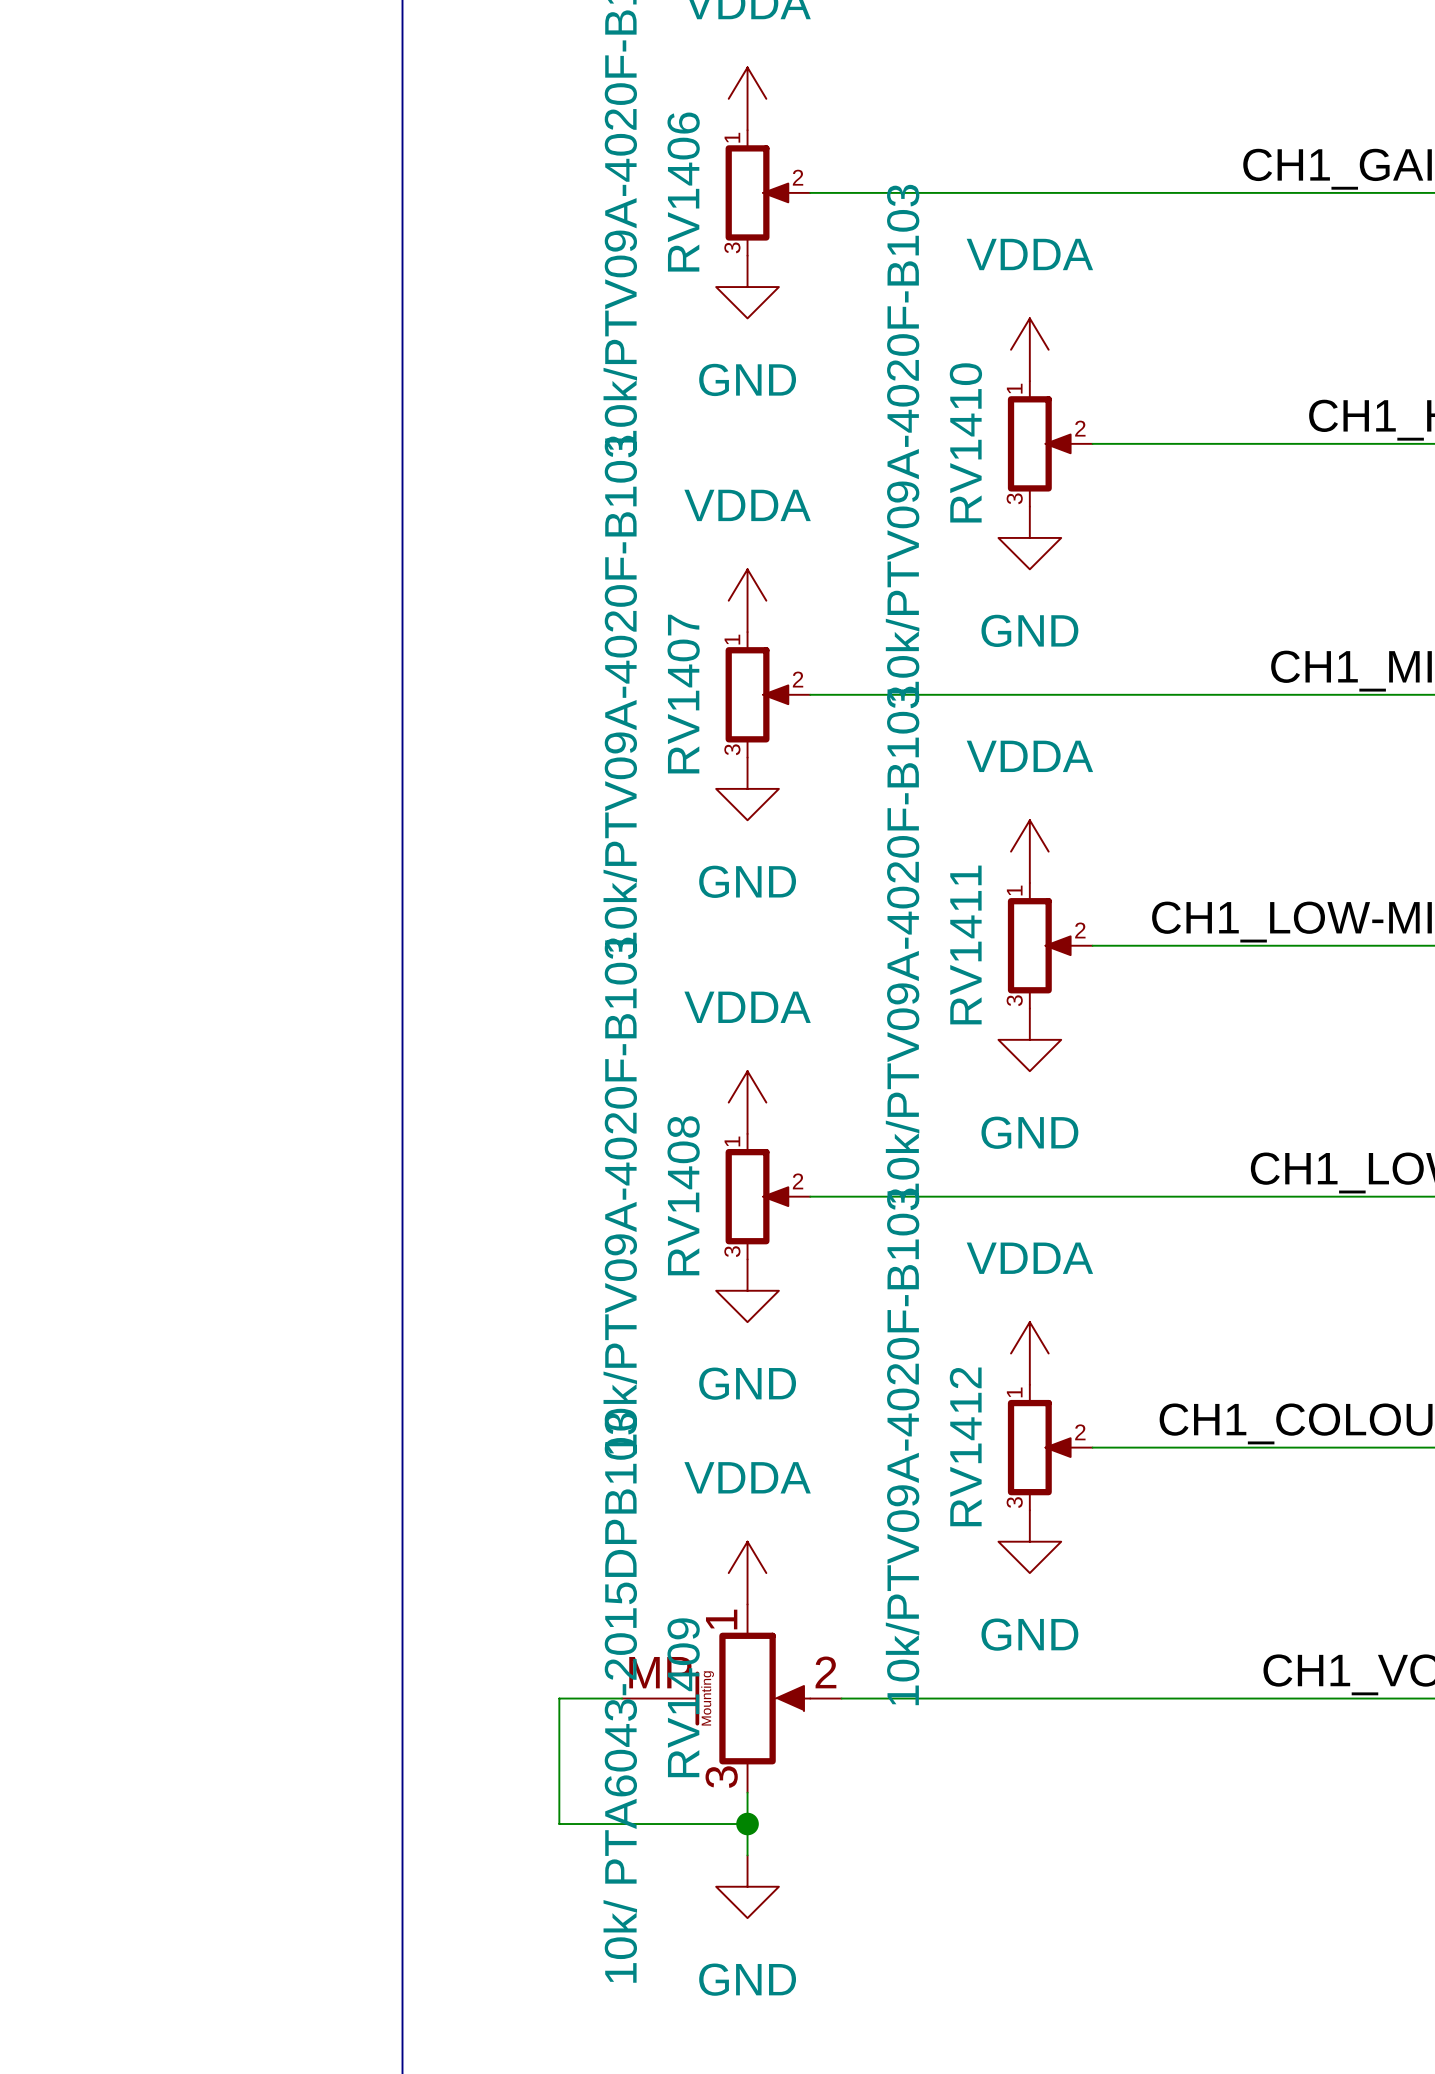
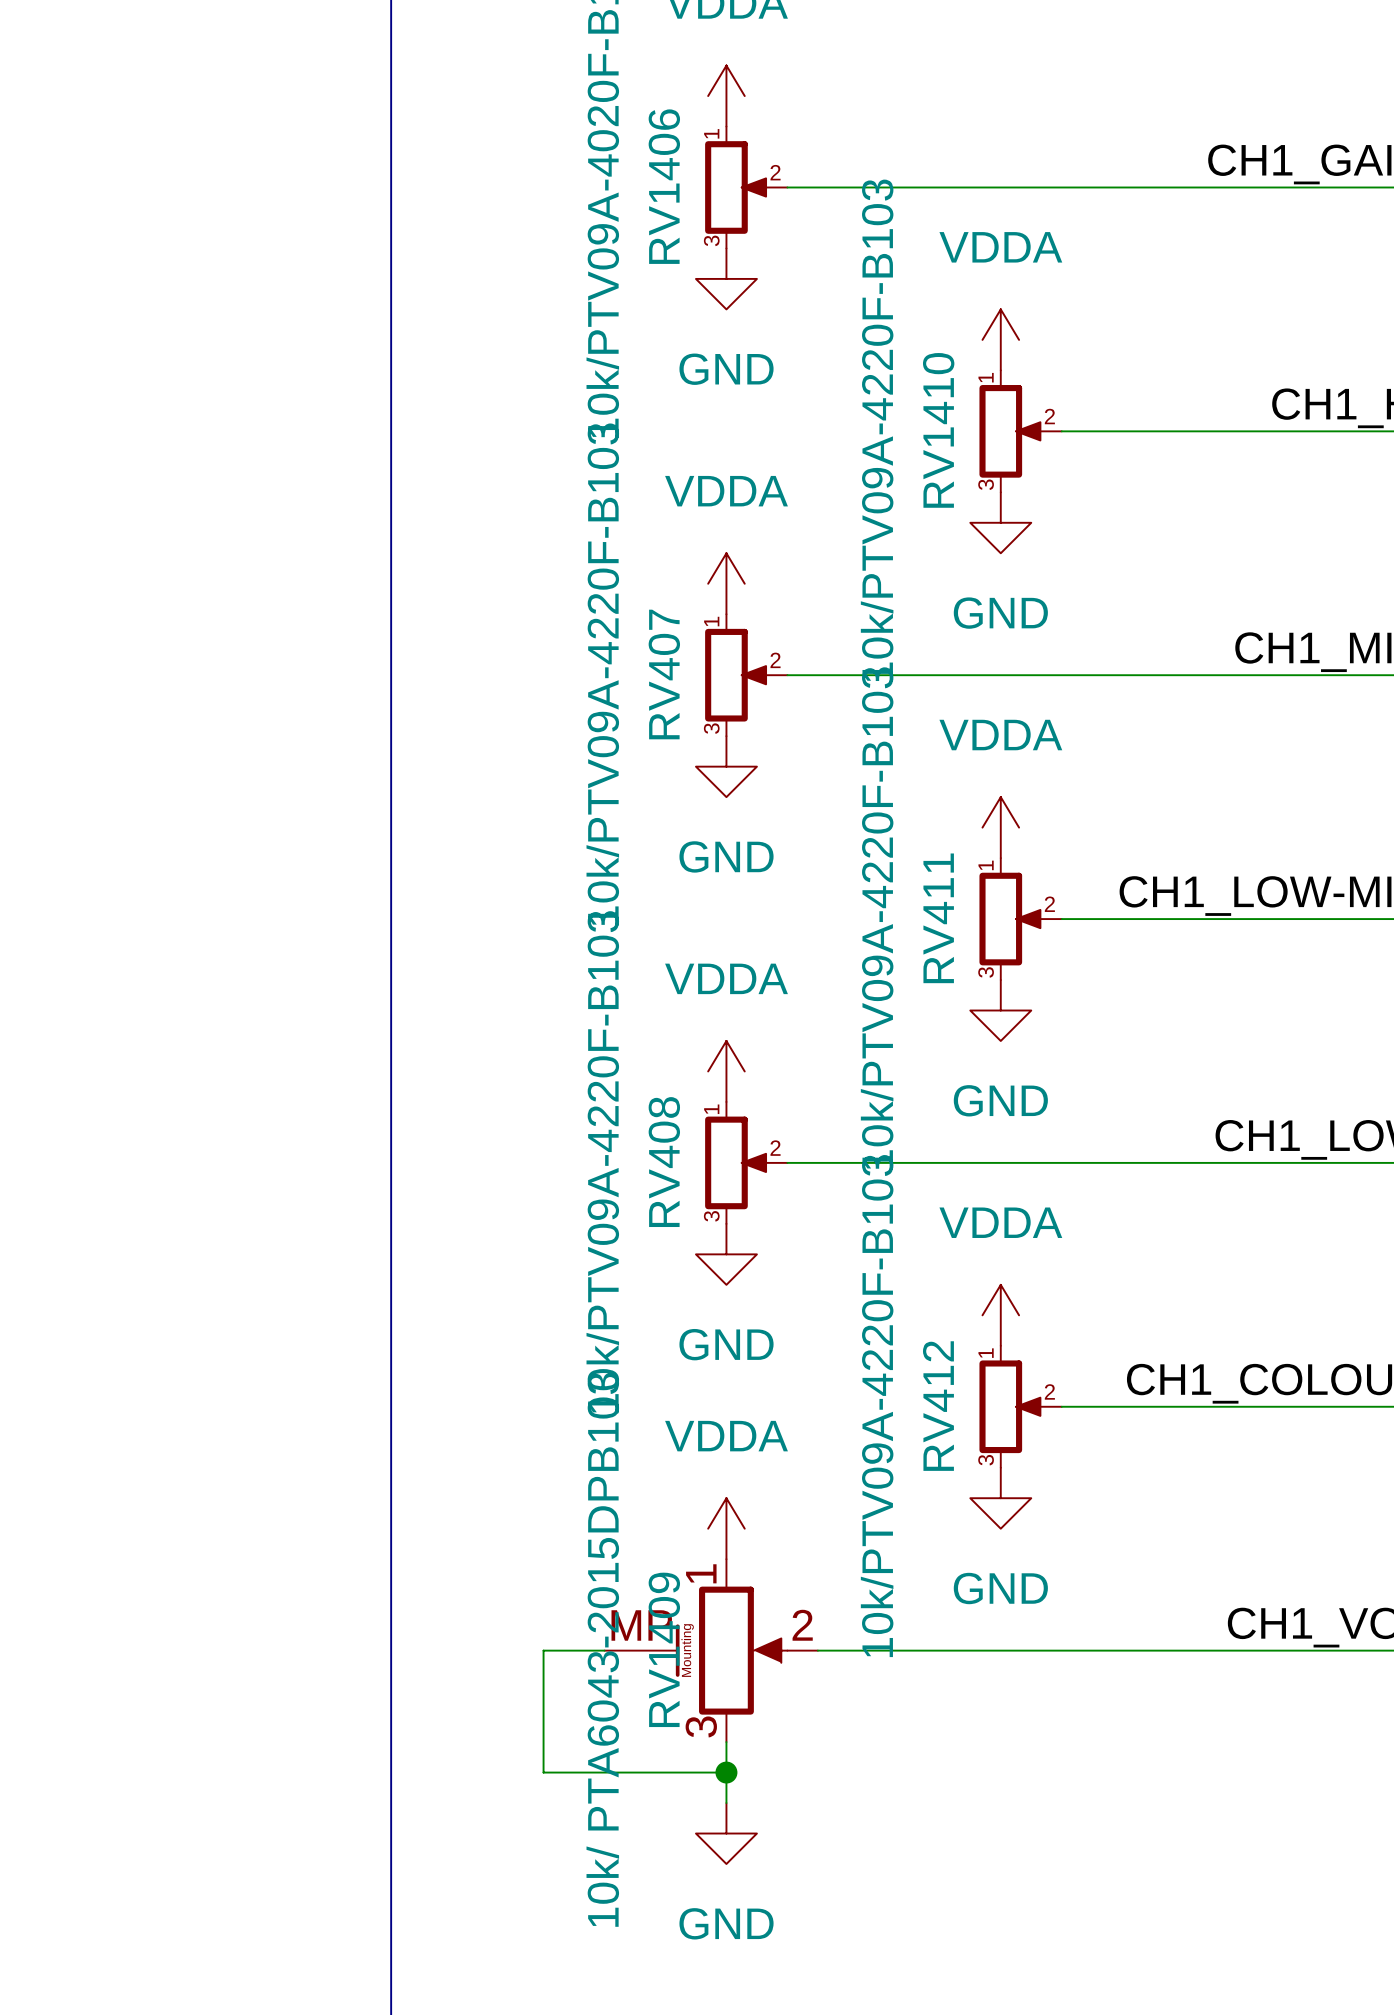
RV1410 value: 10k/PTV09A-4020F-B103 (902, 443) -> 10k/PTV09A-4220F-B103 (877, 430)
RV1407 value: 10k/PTV09A-4020F-B103 (620, 694) -> 10k/PTV09A-4220F-B103 (602, 674)
RV1407 name: RV1407 (683, 694) -> RV407 (664, 674)
RV1411 name: RV1411 (965, 944) -> RV411 (938, 918)
RV1411 value: 10k/PTV09A-4020F-B103 (902, 945) -> 10k/PTV09A-4220F-B103 (877, 918)
RV1408 value: 10k/PTV09A-4020F-B103 (620, 1195) -> 10k/PTV09A-4220F-B103 (602, 1162)
RV1408 name: RV1408 (683, 1195) -> RV408 (664, 1162)
RV1412 value: 10k/PTV09A-4020F-B103 (902, 1446) -> 10k/PTV09A-4220F-B103 (877, 1406)
RV1412 name: RV1412 (965, 1446) -> RV412 (938, 1406)

